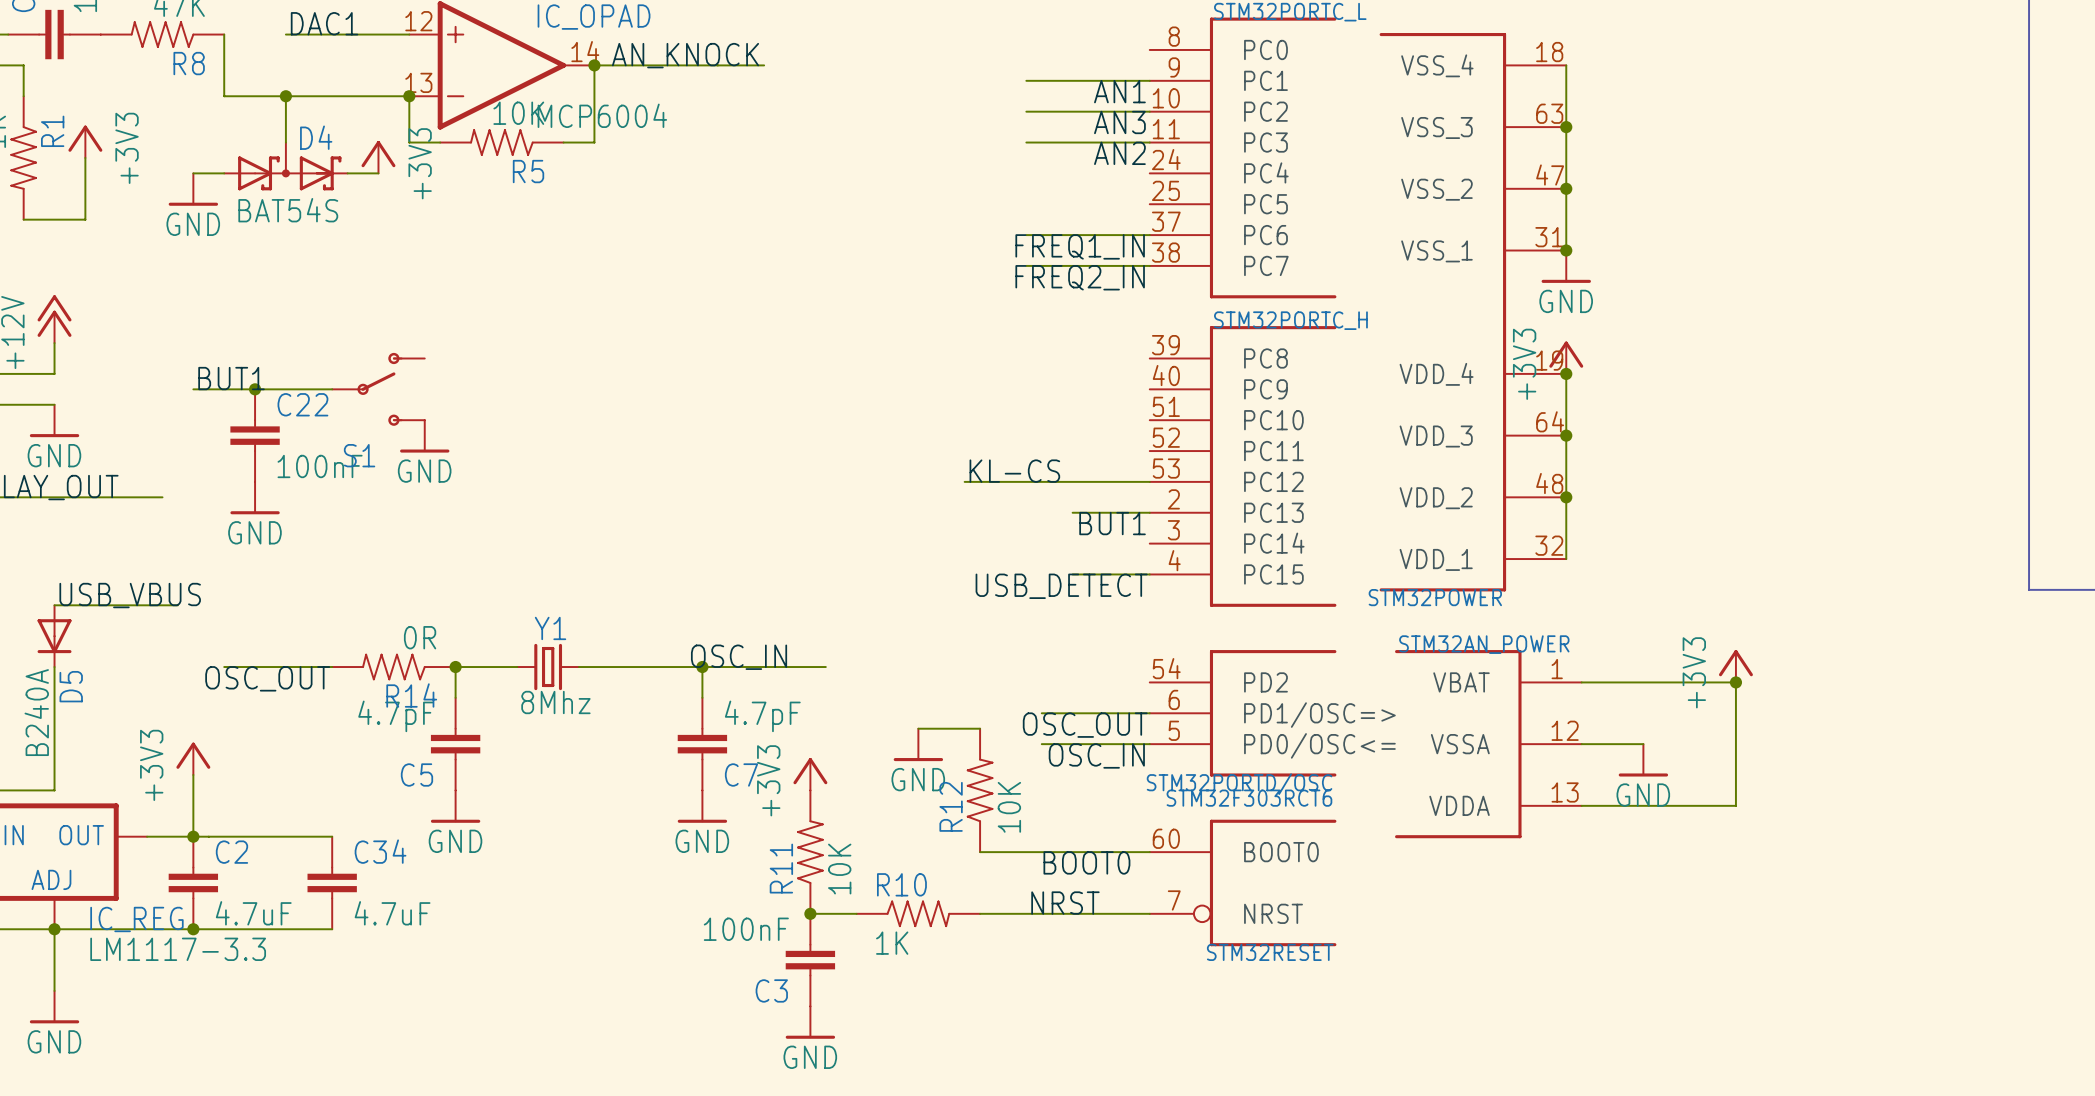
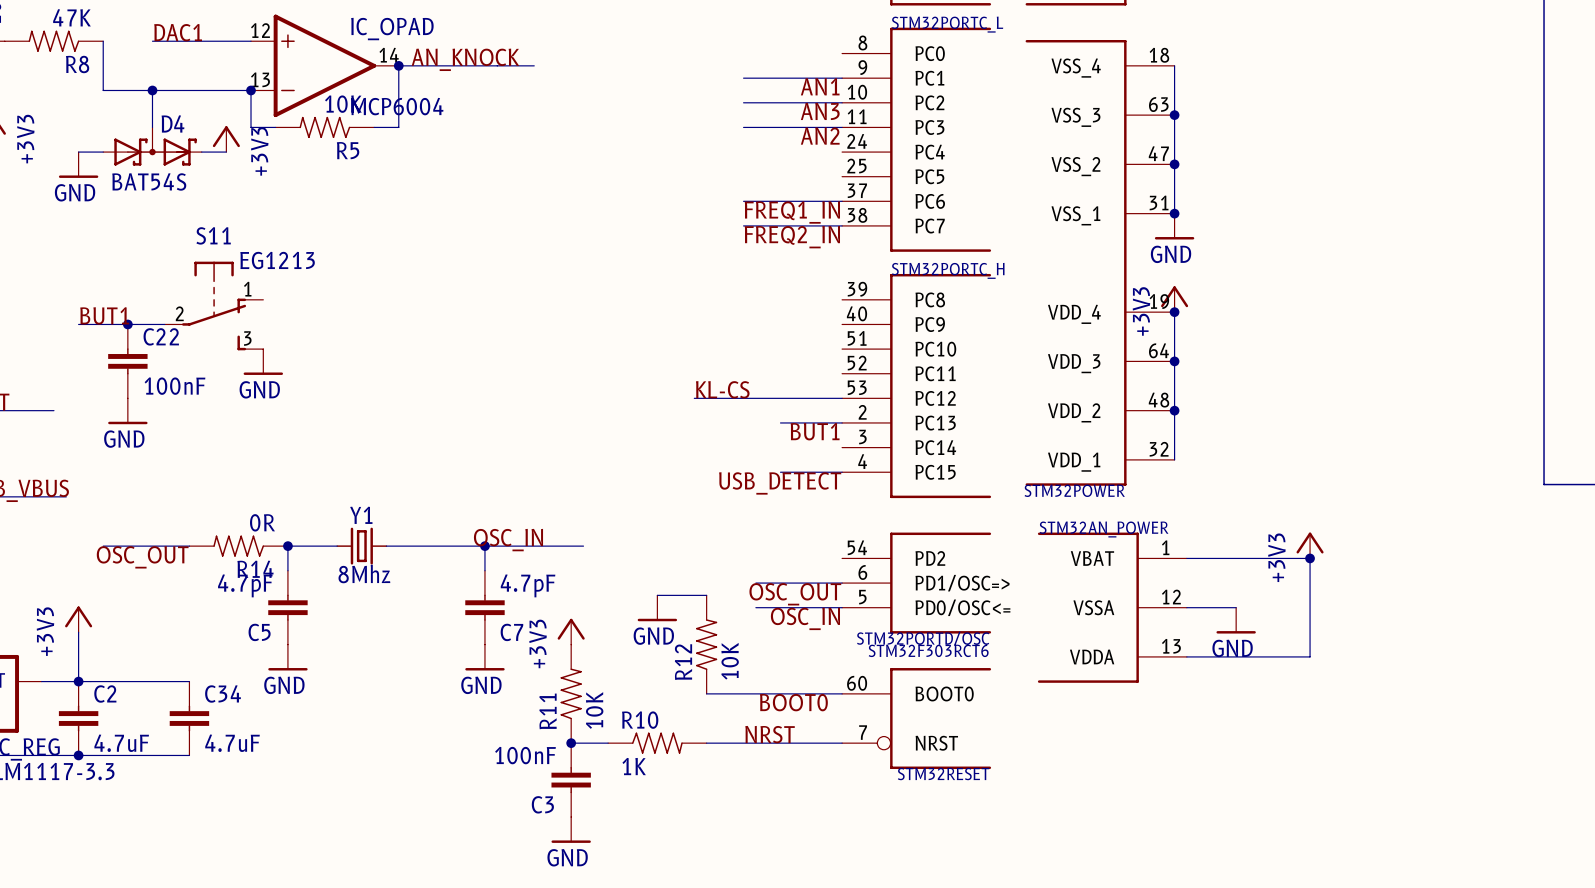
S11: none -> EG1213 (214, 305)
S1: (378, 389) -> none

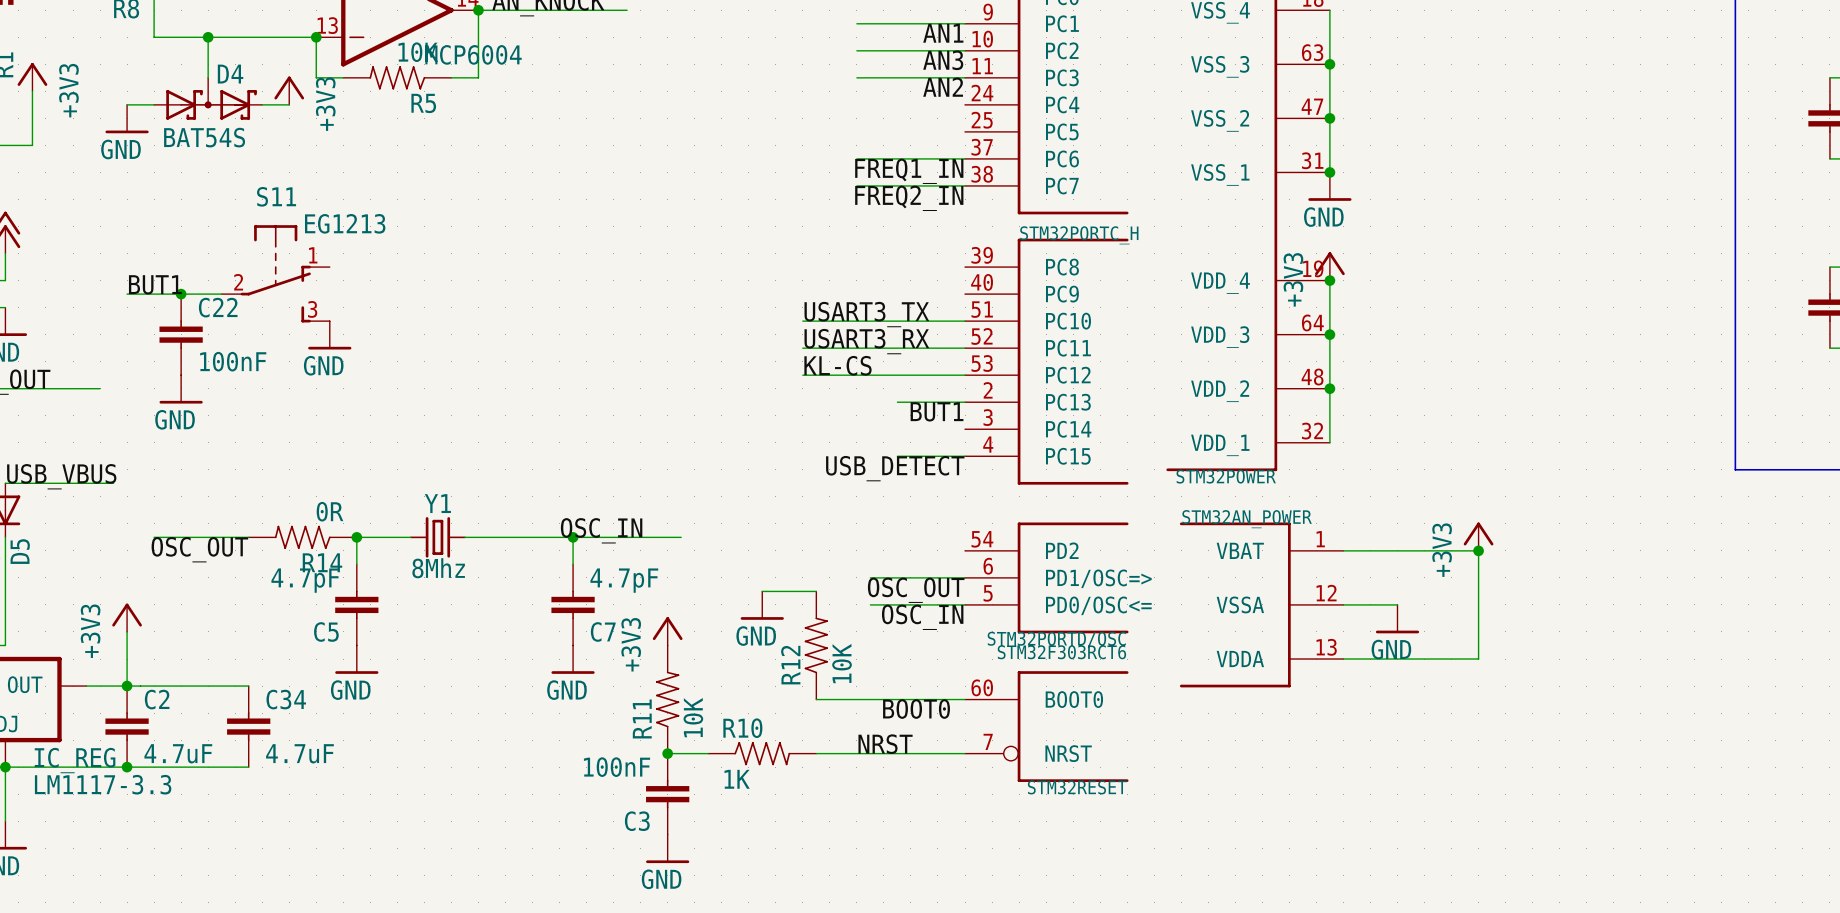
label: none -> USART3_TX (866, 314)
wire: none -> (802, 321) (965, 321)
label: none -> USART3_RX (866, 341)
wire: none -> (802, 348) (965, 348)

